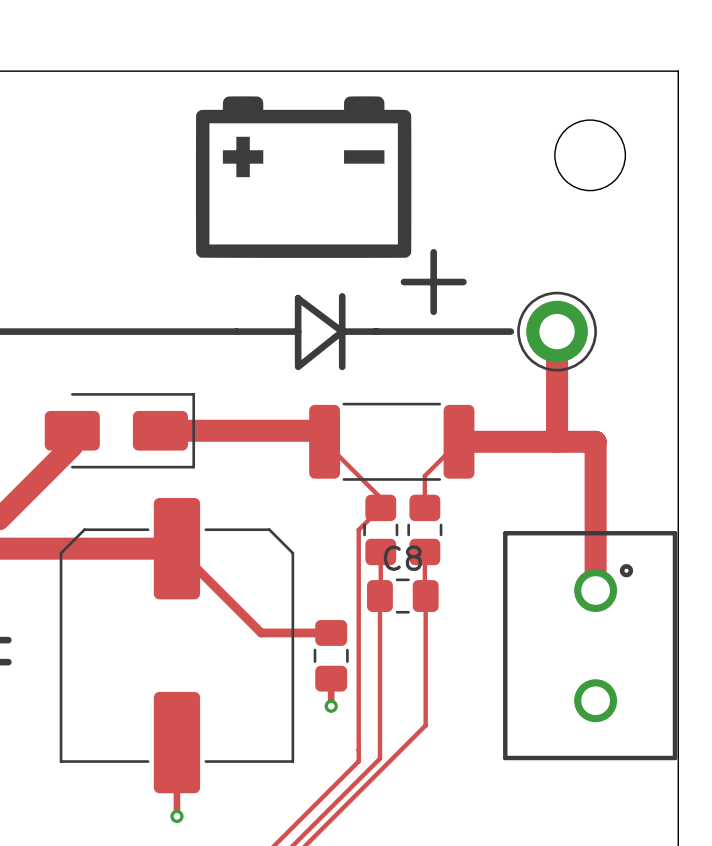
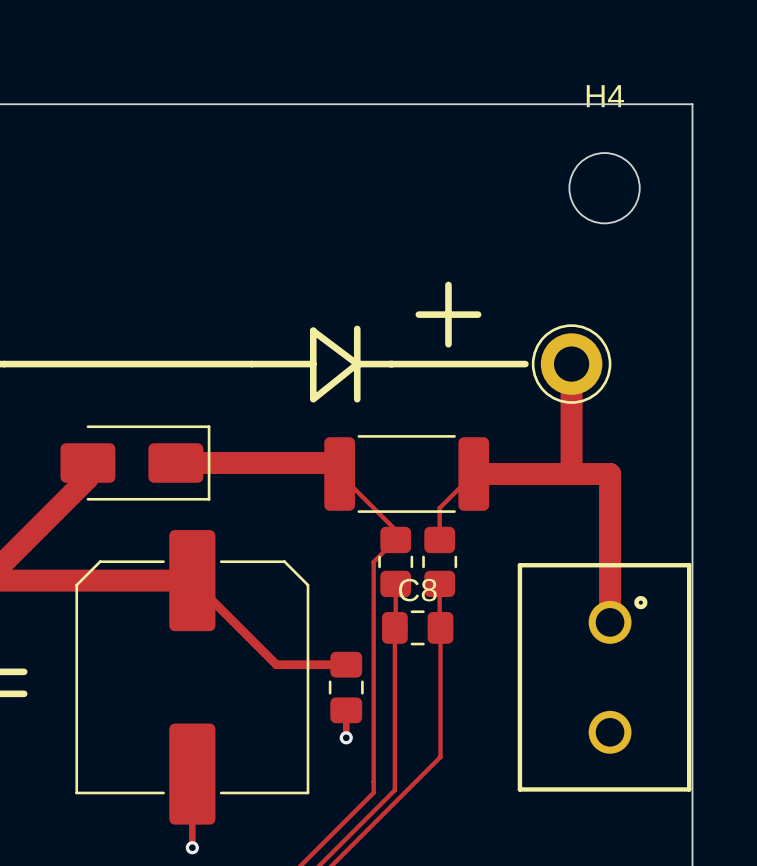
H4 name: none -> H4 (605, 96)
drawing: [195, 96, 412, 258] -> none

